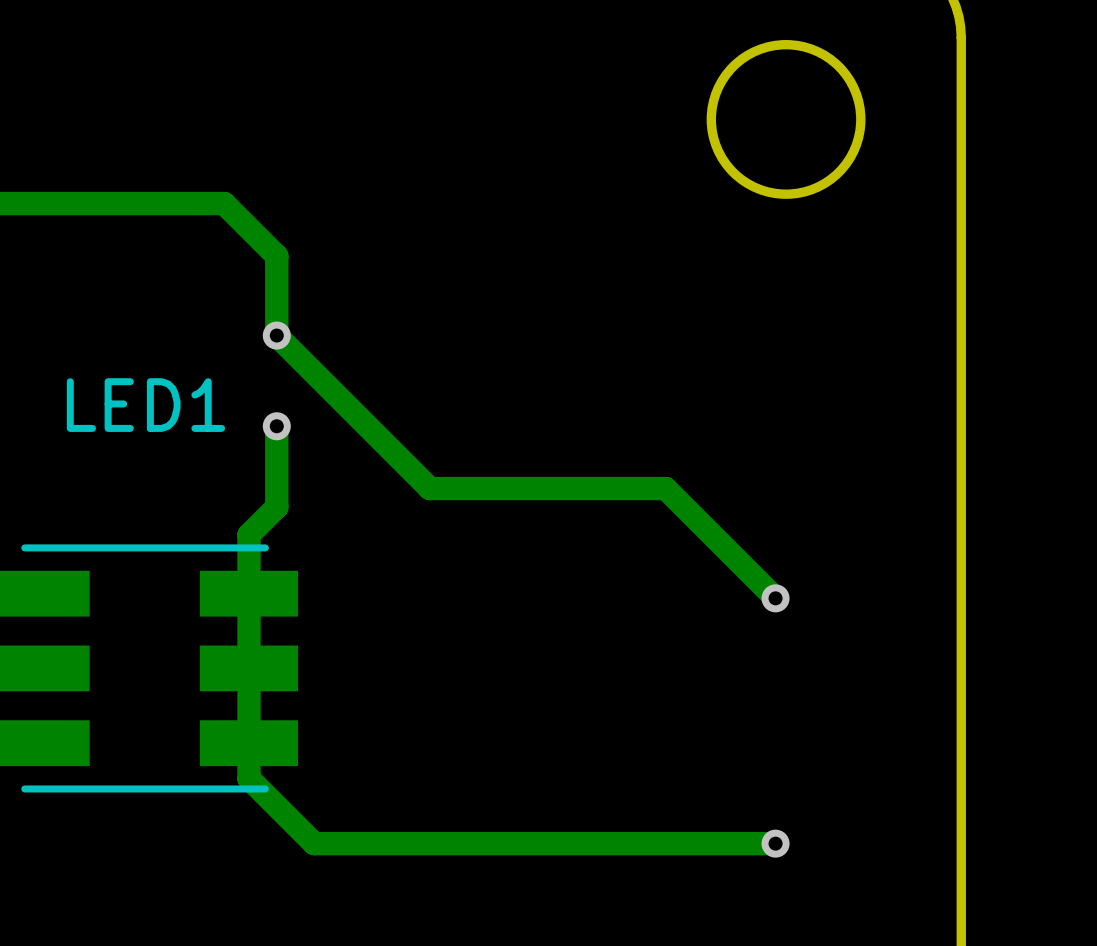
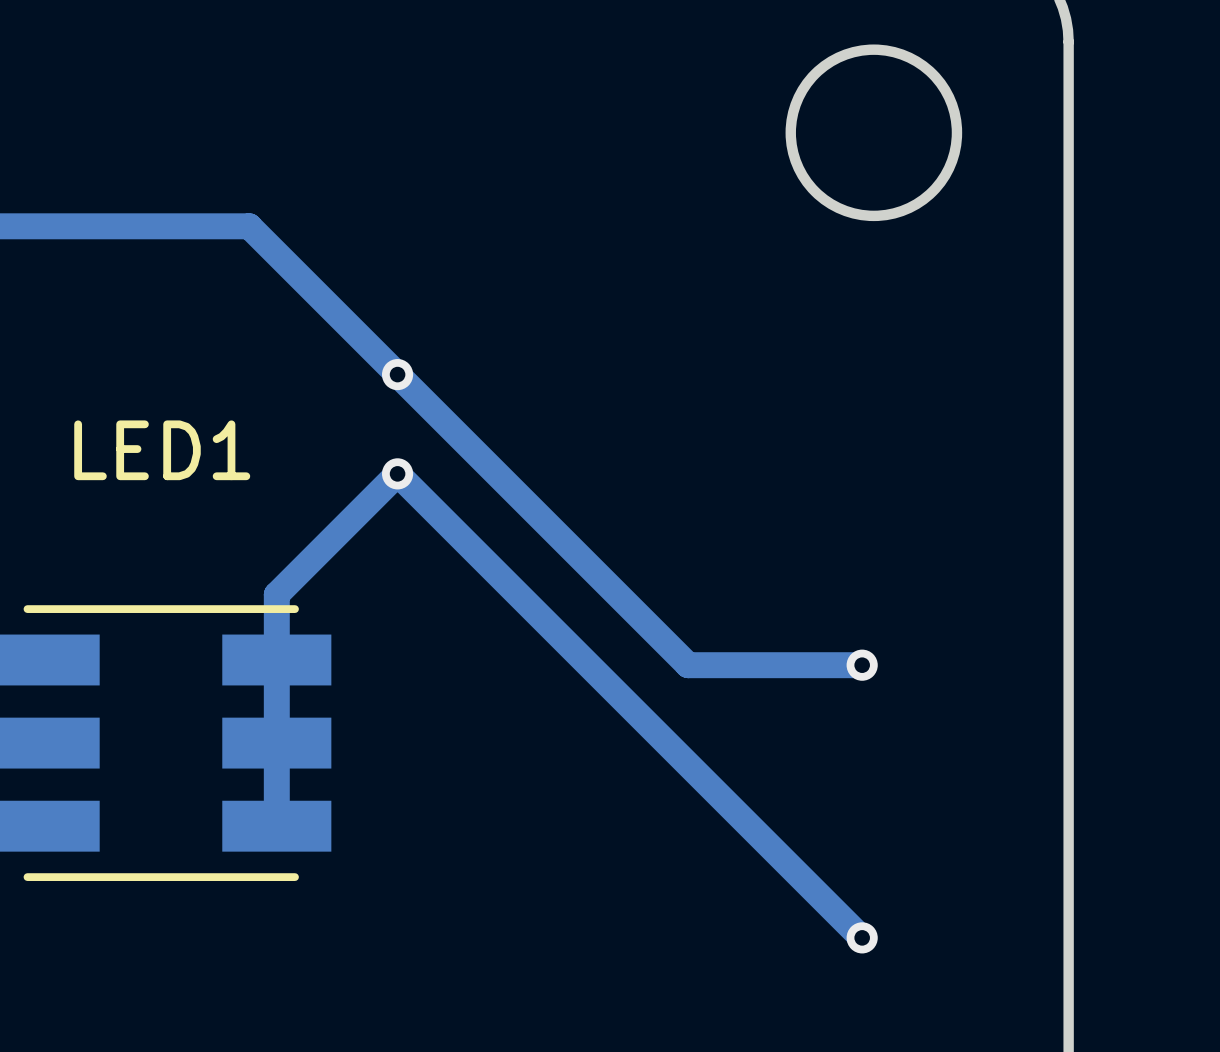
track: (276, 256) (276, 335) (429, 488) (665, 488) (775, 598) -> (307, 284) (688, 665) (862, 665)
via: (276, 335) -> none
via: none -> (397, 374)
track: (276, 426) (276, 507) -> none
via: (276, 426) -> none
via: none -> (397, 473)
track: (249, 743) (249, 778) (314, 843) (775, 843) -> (307, 563) (397, 473) (861, 937)

